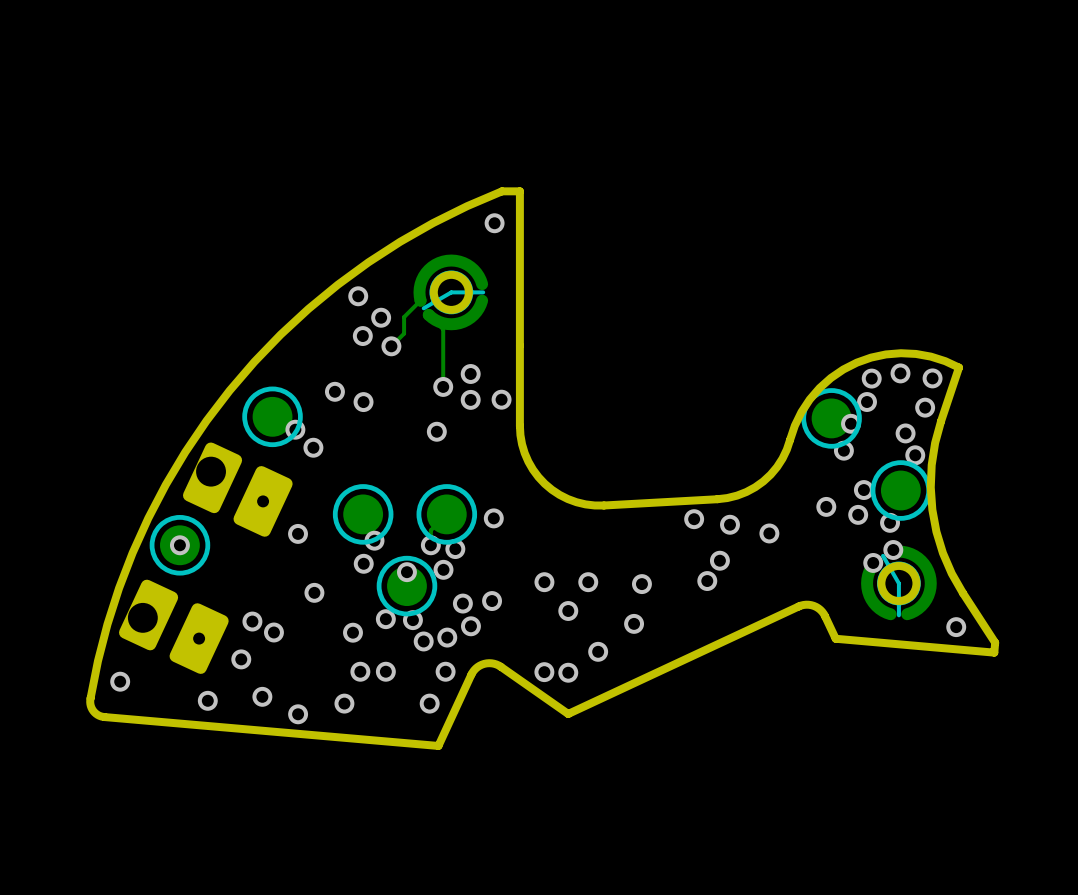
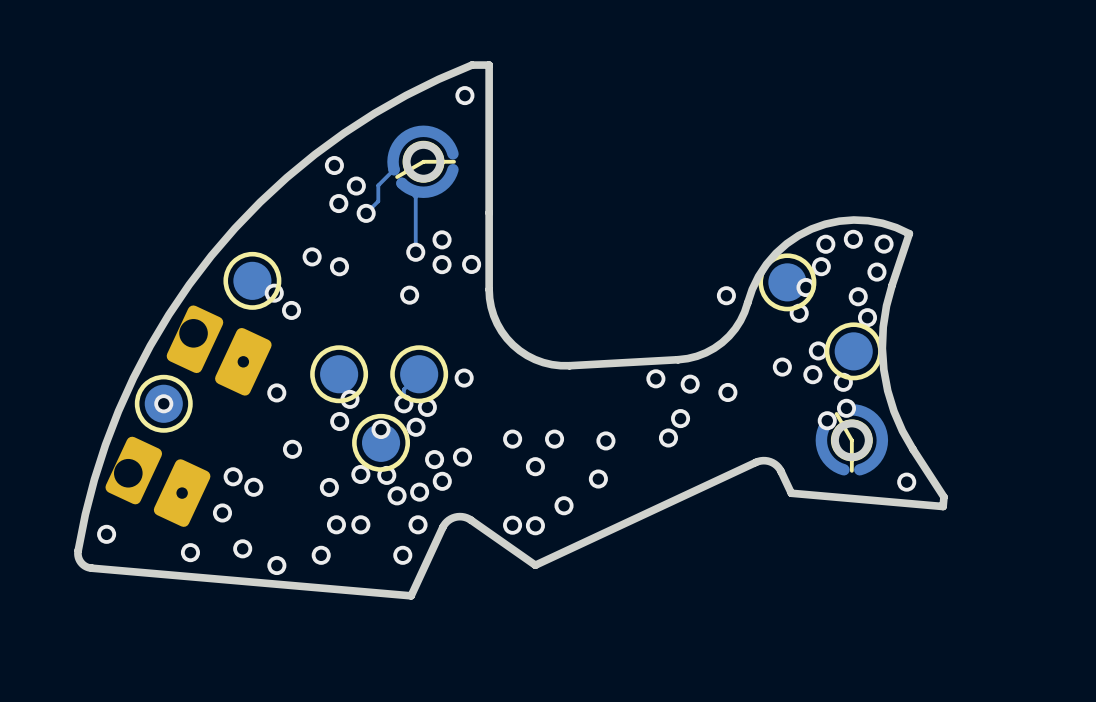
via: none -> (726, 295)

